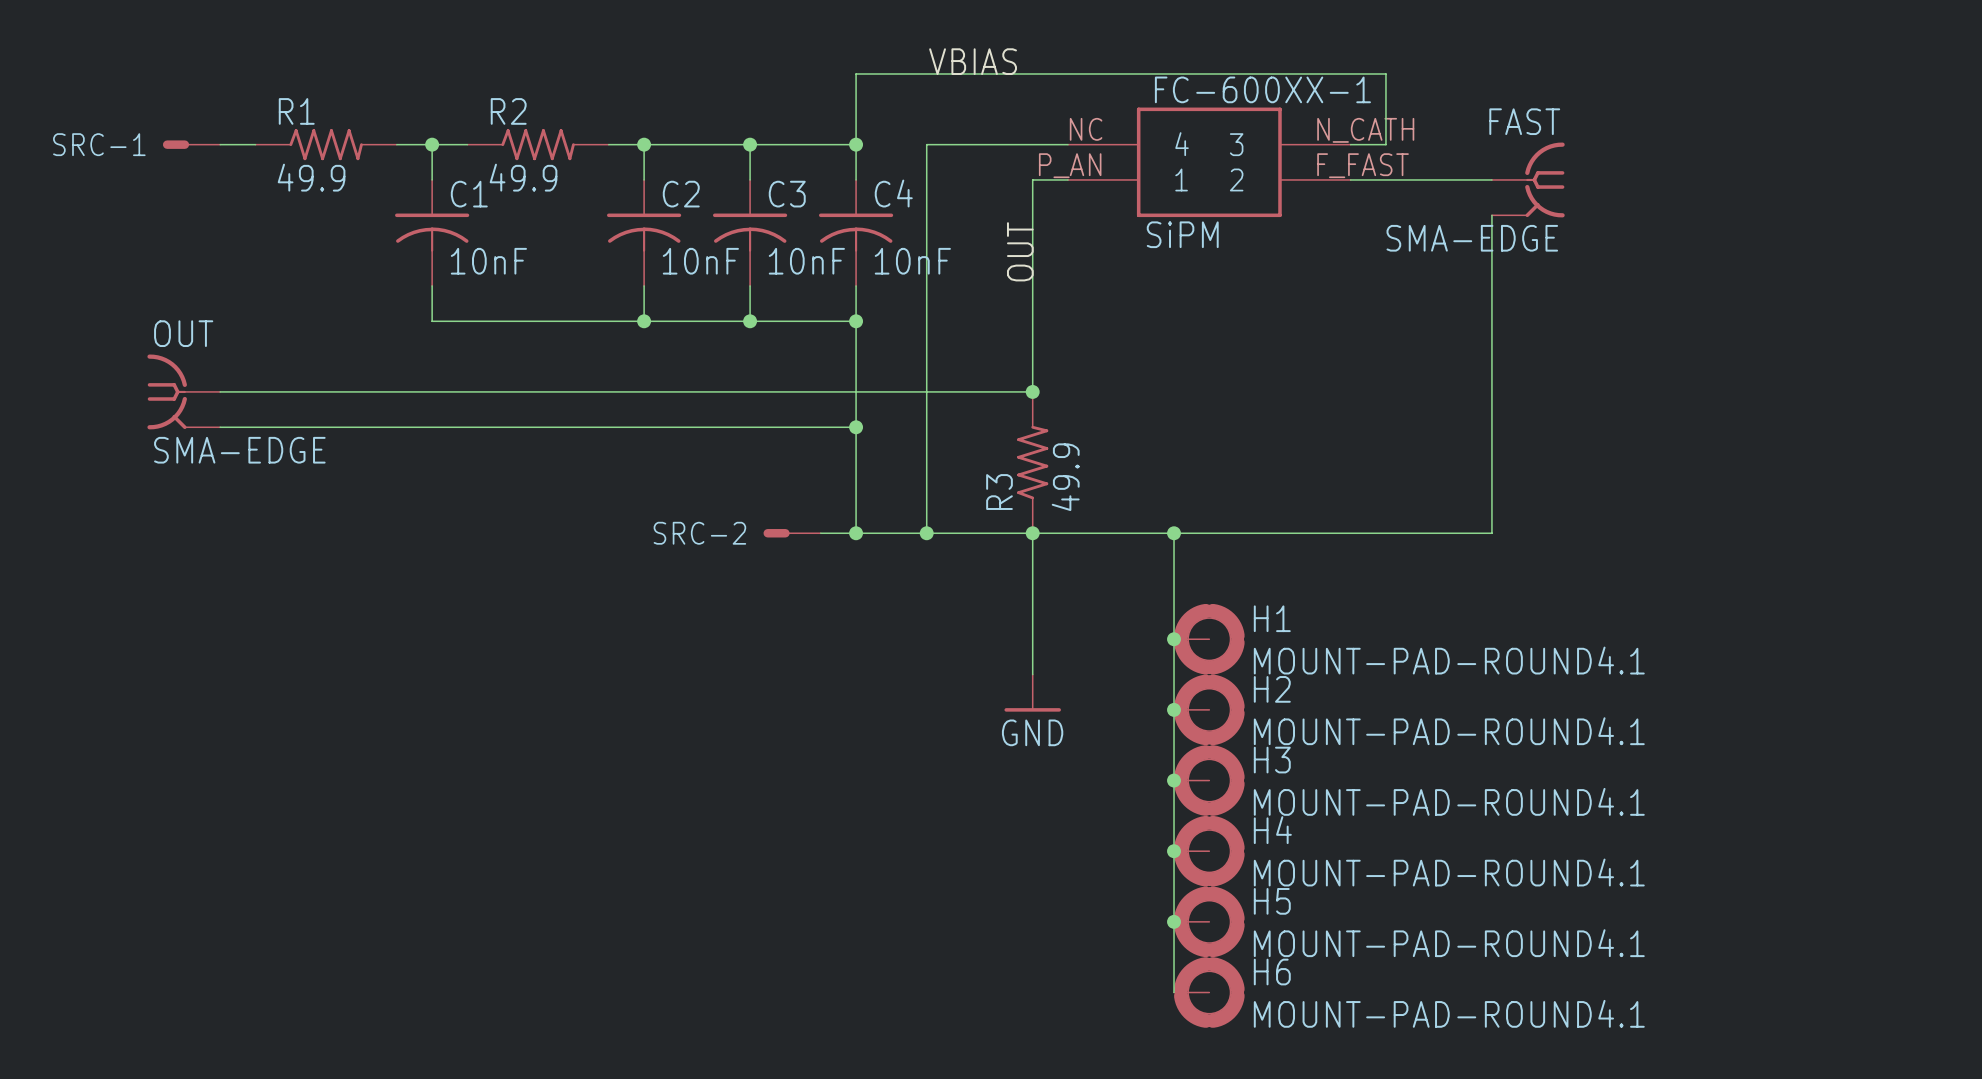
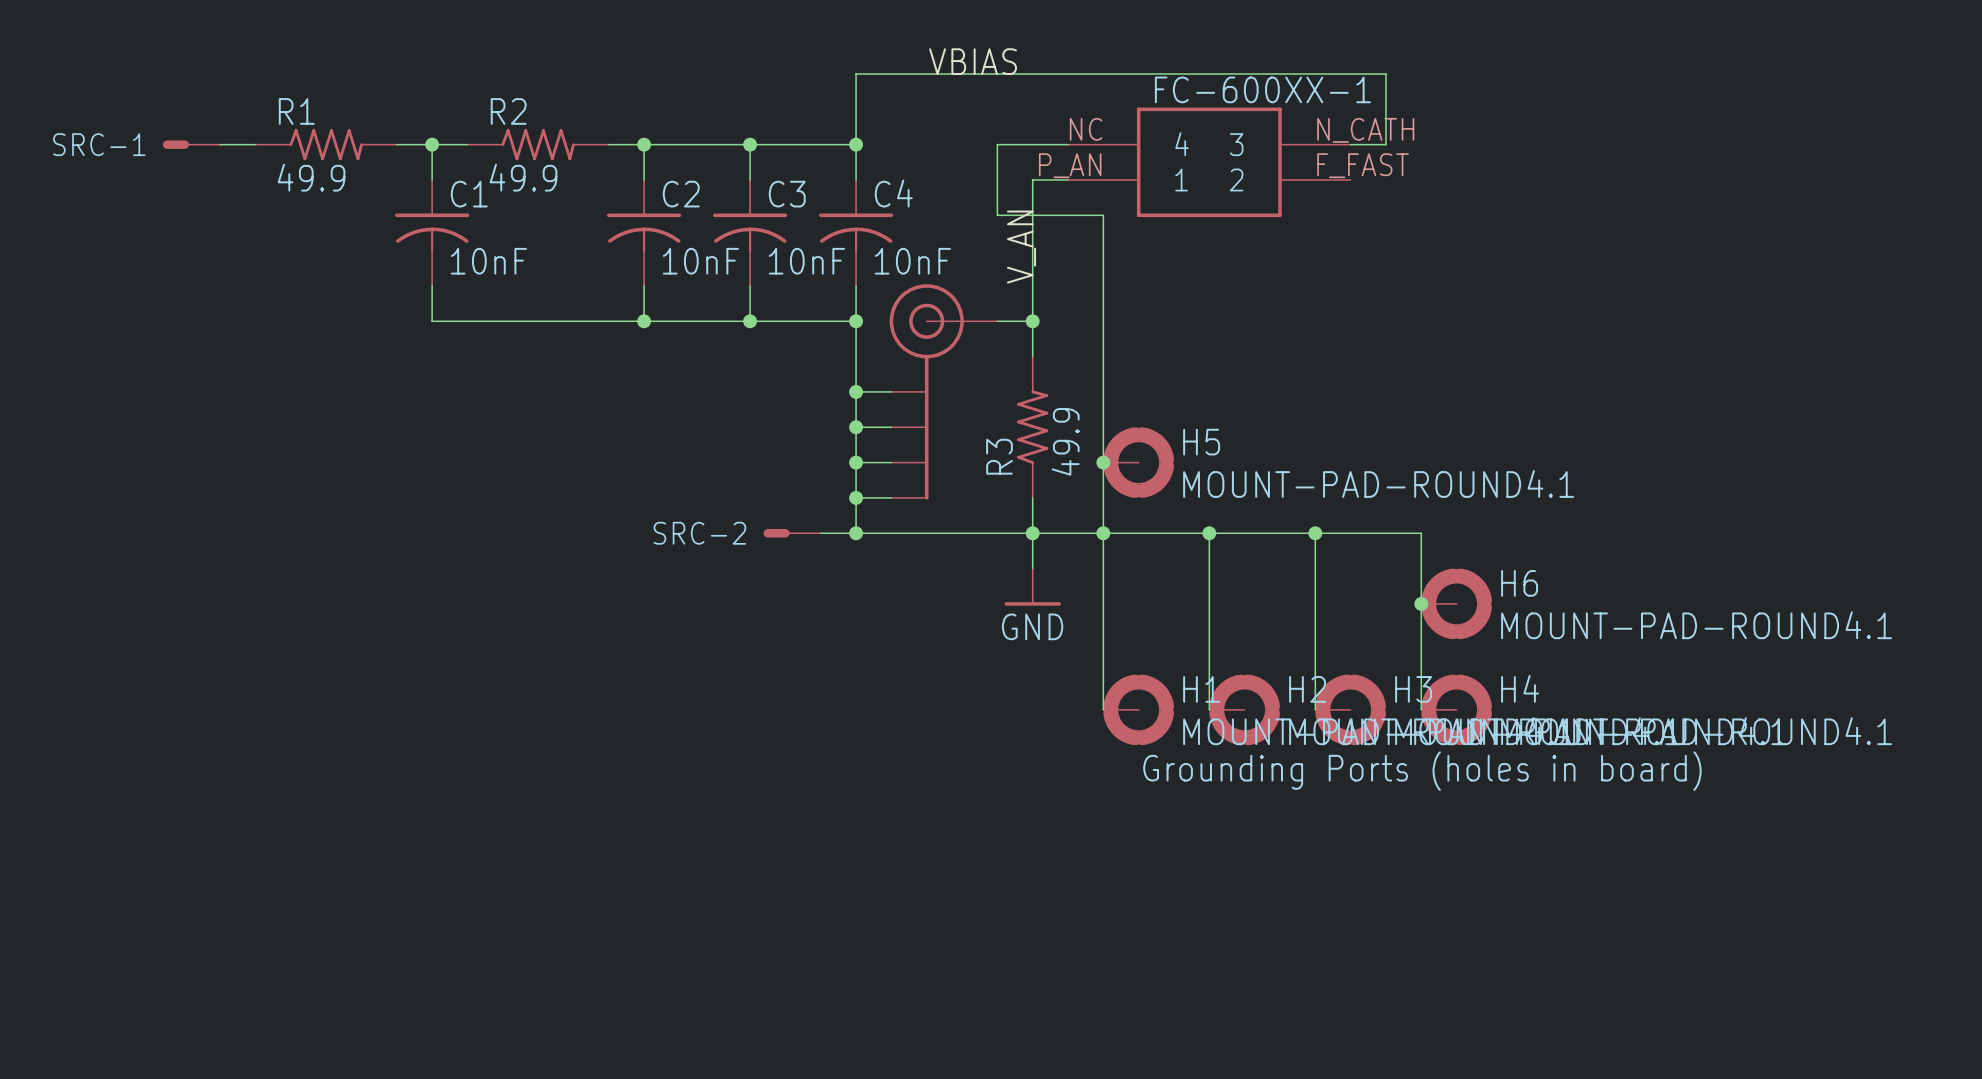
wire: (997, 144) (926, 144) (926, 533) -> (997, 144) (997, 215) (1103, 215) (1103, 709)
wire: (1350, 179) (1491, 179) -> none
FAST: SMA-EDGE (1528, 179) -> none
wire: (1491, 215) (1491, 533) (1421, 533) -> (1421, 709) (1421, 533)
FC-600XX-1 value: SiPM (1182, 234) -> none
label: OUT (1020, 251) -> V_AN (1021, 247)
wire: none -> (997, 321) (1032, 321)
junction: none -> (1032, 321)
wire: (1032, 356) (1032, 391) (891, 391) -> none
OUT: SMA-EDGE (183, 391) -> none
wire: (220, 391) (856, 391) -> none
junction: none -> (856, 391)
part: none -> (943, 391)
junction: (1032, 391) -> none
wire: (220, 427) (856, 427) -> (891, 427) (856, 427)
wire: none -> (856, 462) (891, 462)
junction: none -> (856, 462)
R3 position: (1032, 462) -> (1032, 427)
junction: none -> (1103, 462)
wire: none -> (856, 497) (891, 497)
junction: none -> (856, 497)
junction: (926, 533) -> none
junction: none -> (1103, 533)
wire: (1174, 533) (1174, 992) -> none
junction: (1174, 533) -> none
wire: none -> (1209, 533) (1209, 709)
junction: none -> (1209, 533)
wire: none -> (1315, 533) (1315, 709)
junction: none -> (1315, 533)
wire: (1032, 568) (1032, 674) -> none
junction: none -> (1421, 603)
junction: (1174, 639) -> none
H1 position: (1209, 639) -> (1138, 709)
power symbol position: GND (1032, 693) -> GND (1032, 587)
junction: (1174, 709) -> none
H2 position: (1209, 709) -> (1244, 709)
text: none -> Grounding Ports (holes in board) (1422, 771)
junction: (1174, 780) -> none
H3 position: (1209, 780) -> (1350, 709)
junction: (1174, 851) -> none
H4 position: (1209, 851) -> (1456, 709)
junction: (1174, 921) -> none
H5 position: (1209, 921) -> (1138, 462)
H6 position: (1209, 992) -> (1456, 603)

